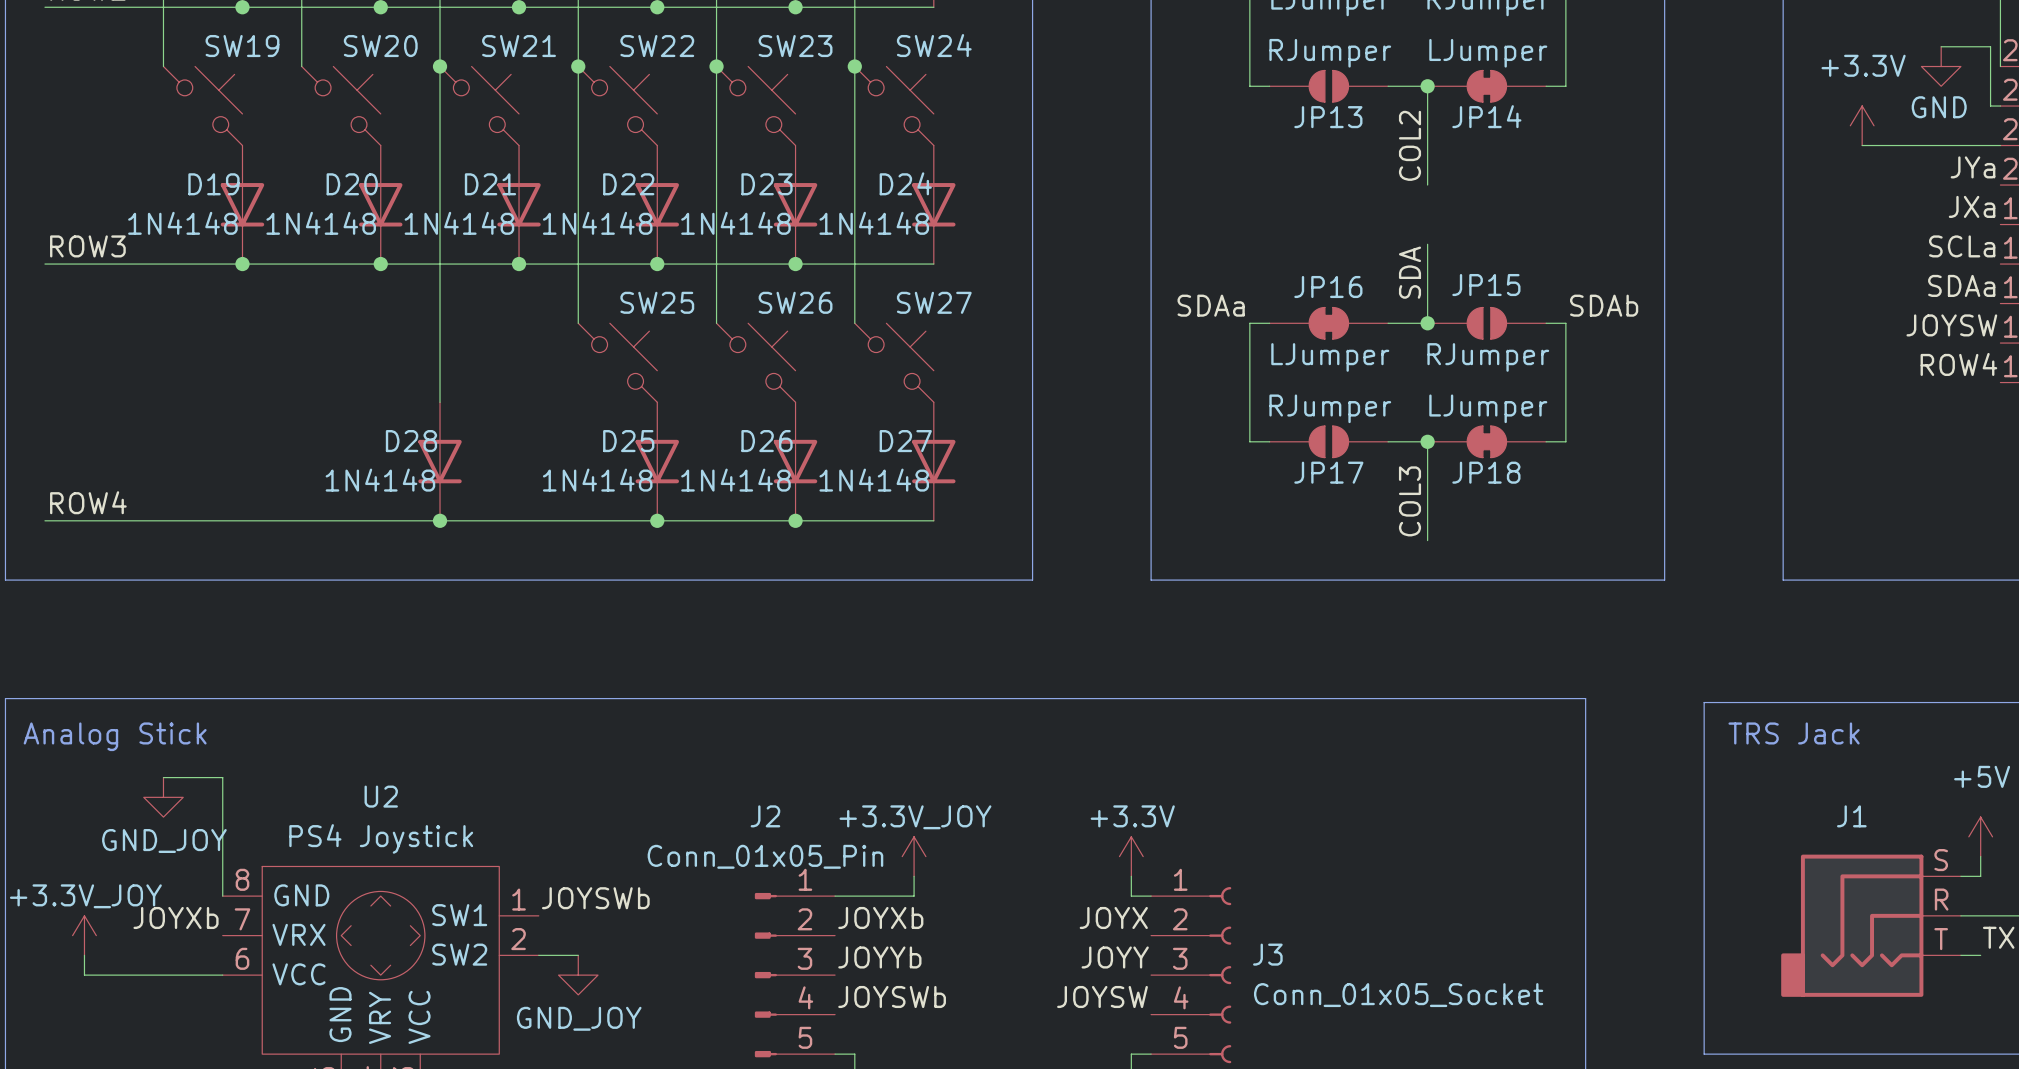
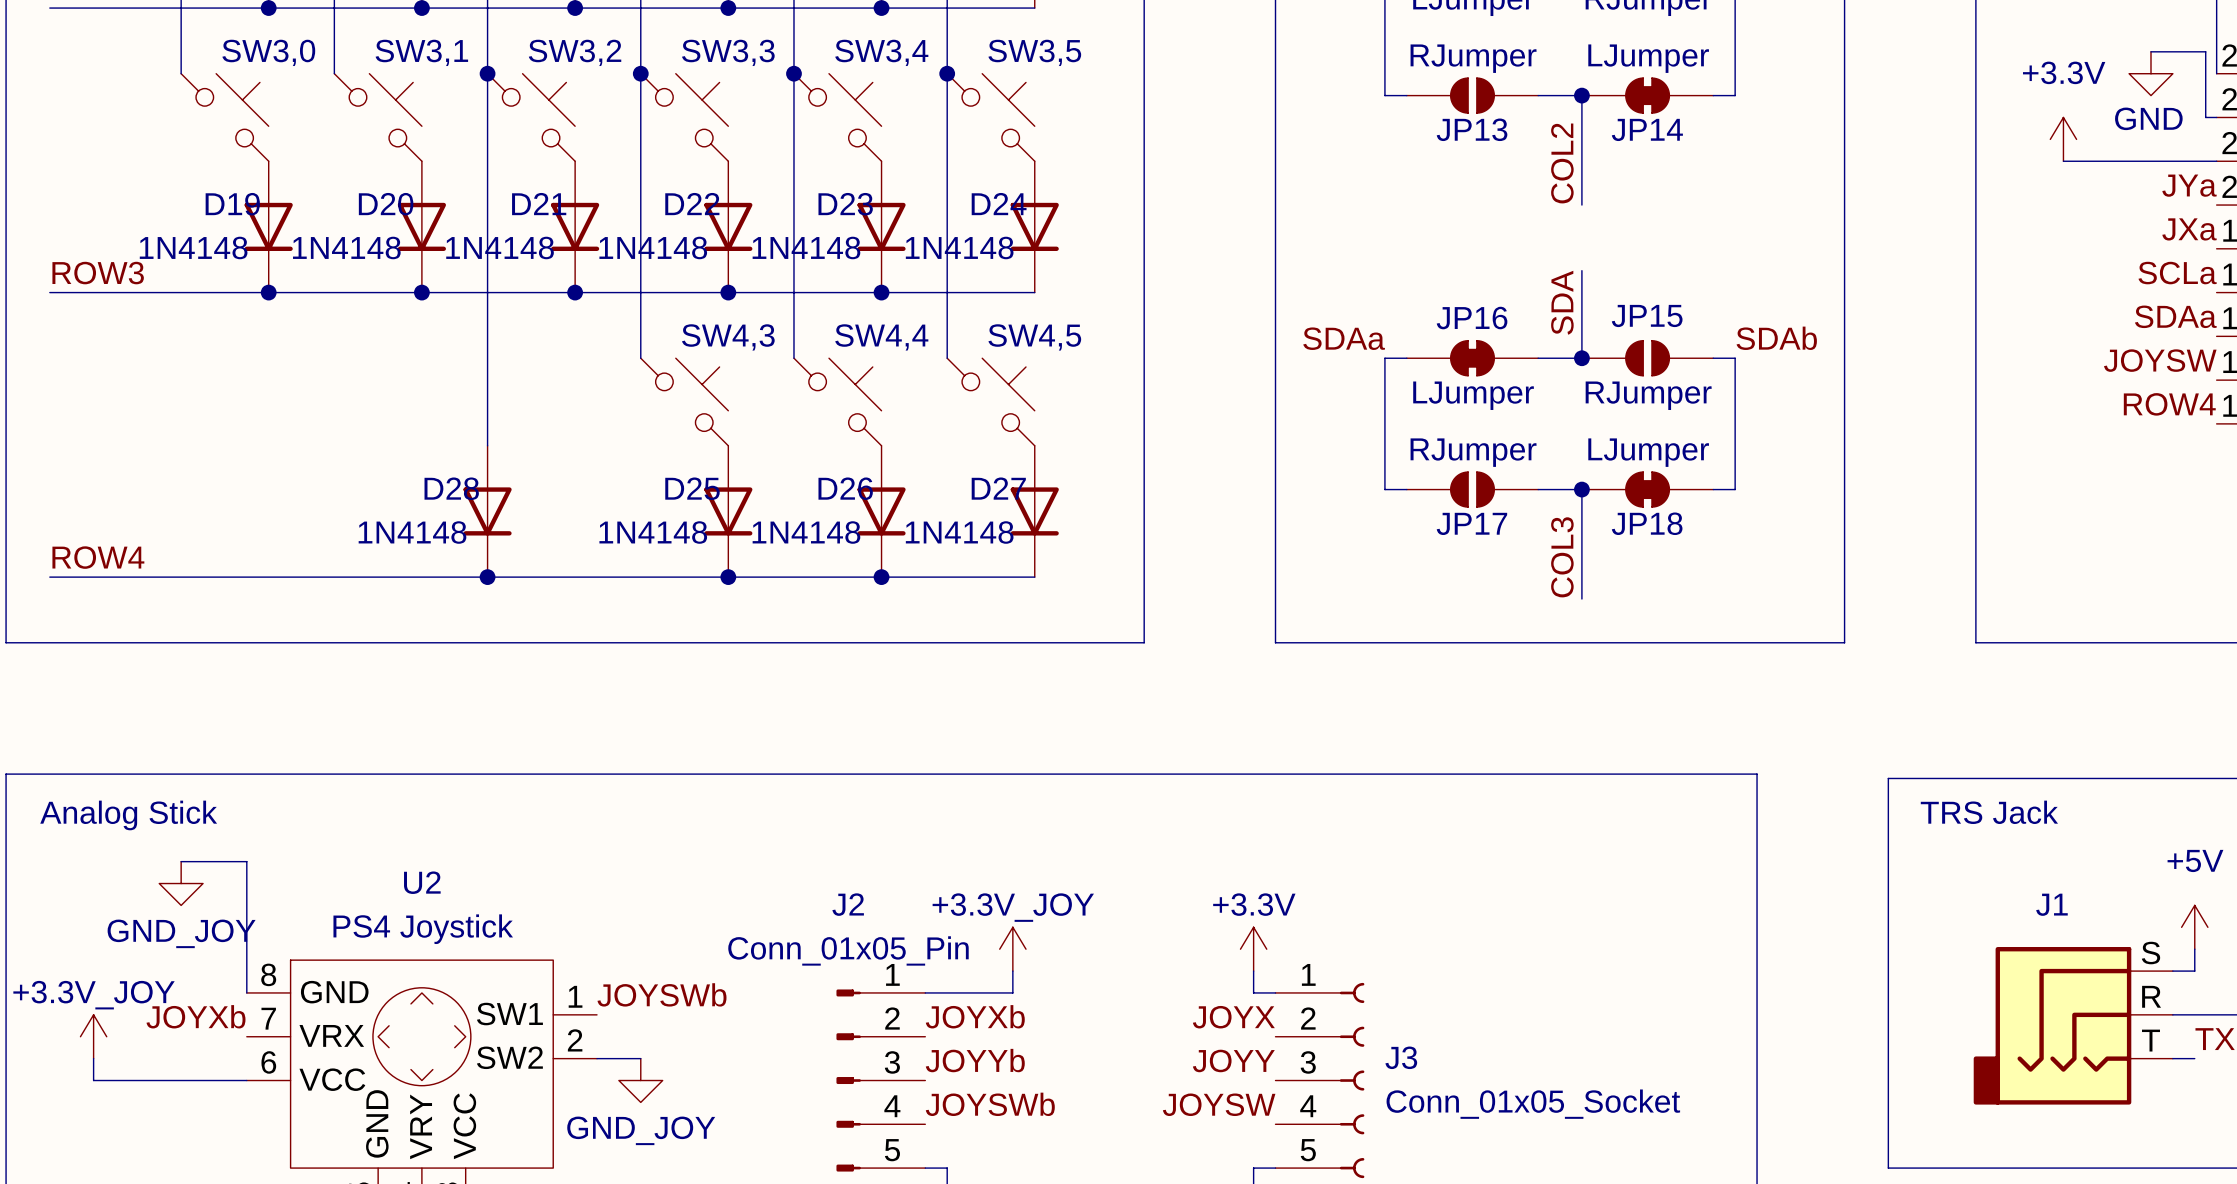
SW24 name: SW24 (934, 45) -> SW3,5 (1034, 52)
SW19 name: SW19 (242, 46) -> SW3,0 (268, 52)
SW20 name: SW20 (380, 46) -> SW3,1 (421, 52)
SW21 name: SW21 (519, 46) -> SW3,2 (575, 52)
SW22 name: SW22 (657, 46) -> SW3,3 (728, 52)
SW23 name: SW23 (795, 46) -> SW3,4 (881, 52)
SW25 name: SW25 (657, 302) -> SW4,3 (728, 337)
SW26 name: SW26 (795, 302) -> SW4,4 (881, 337)
SW27 name: SW27 (934, 302) -> SW4,5 (1034, 337)

